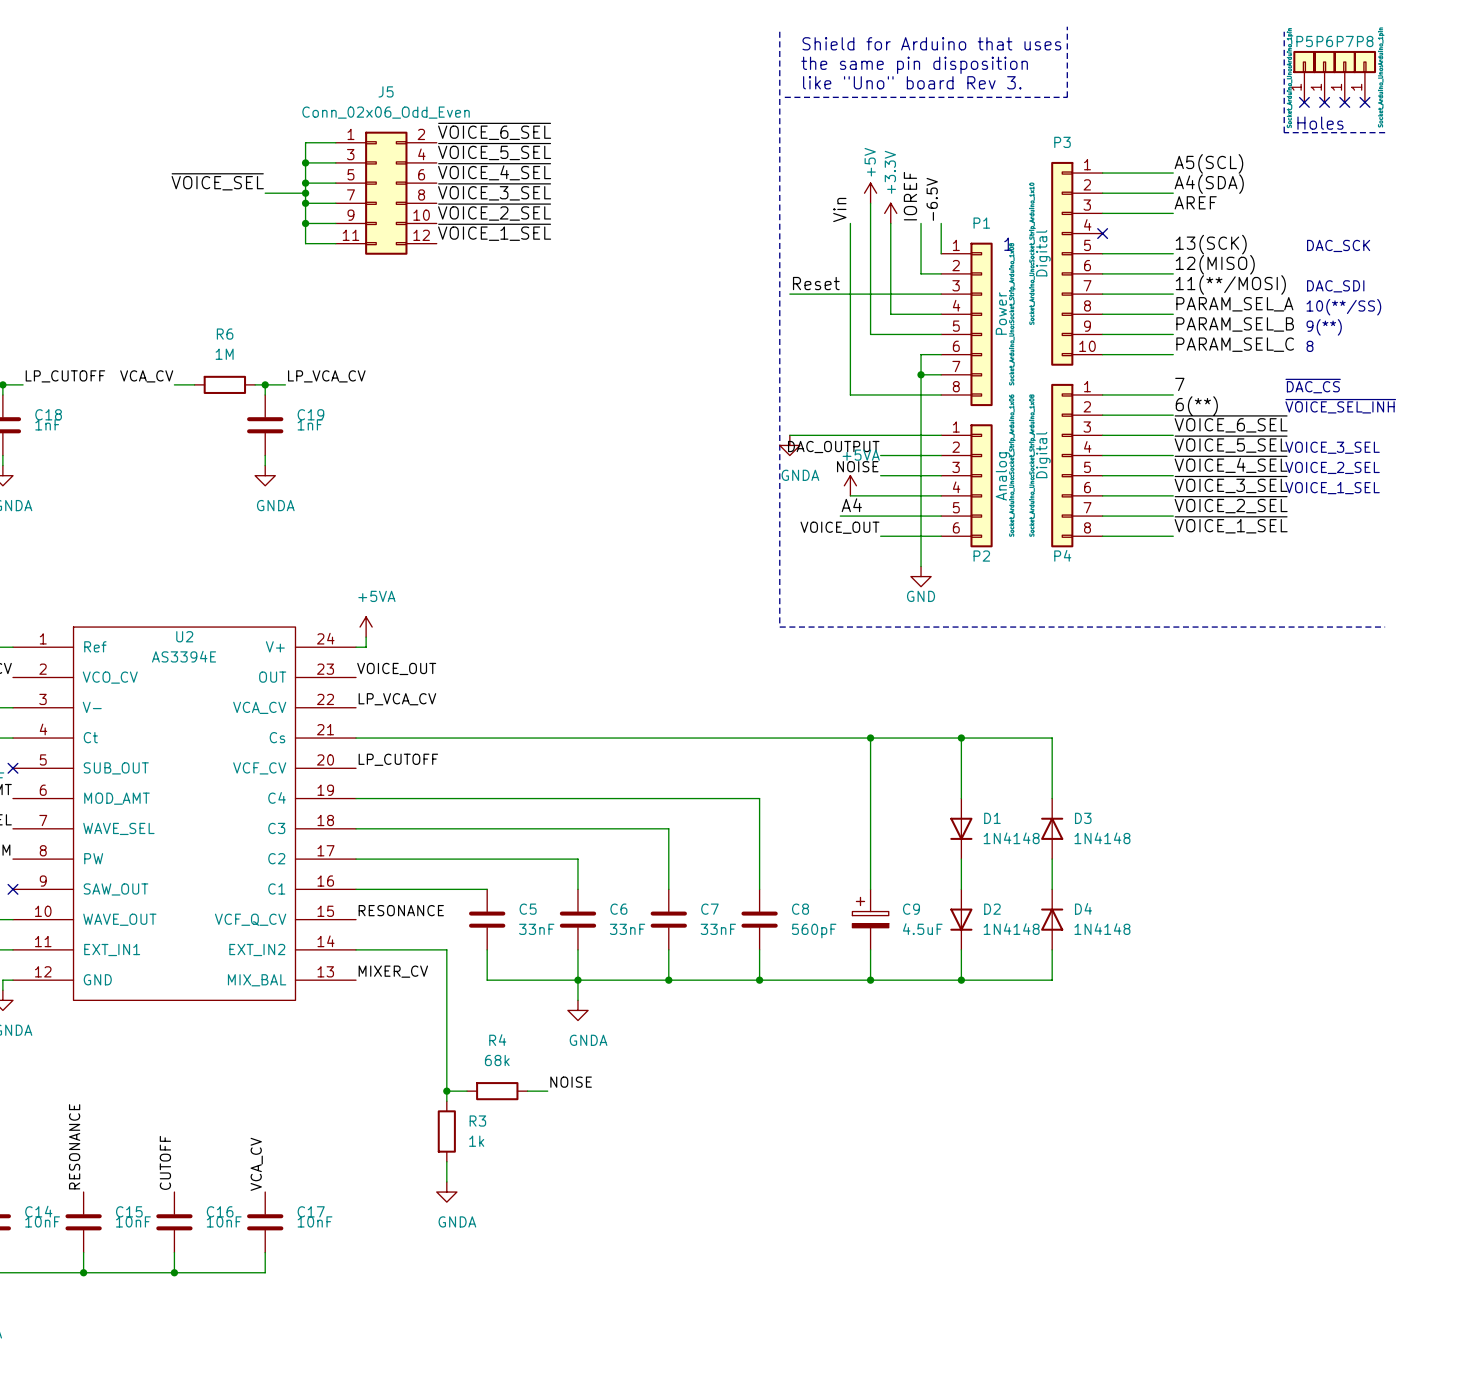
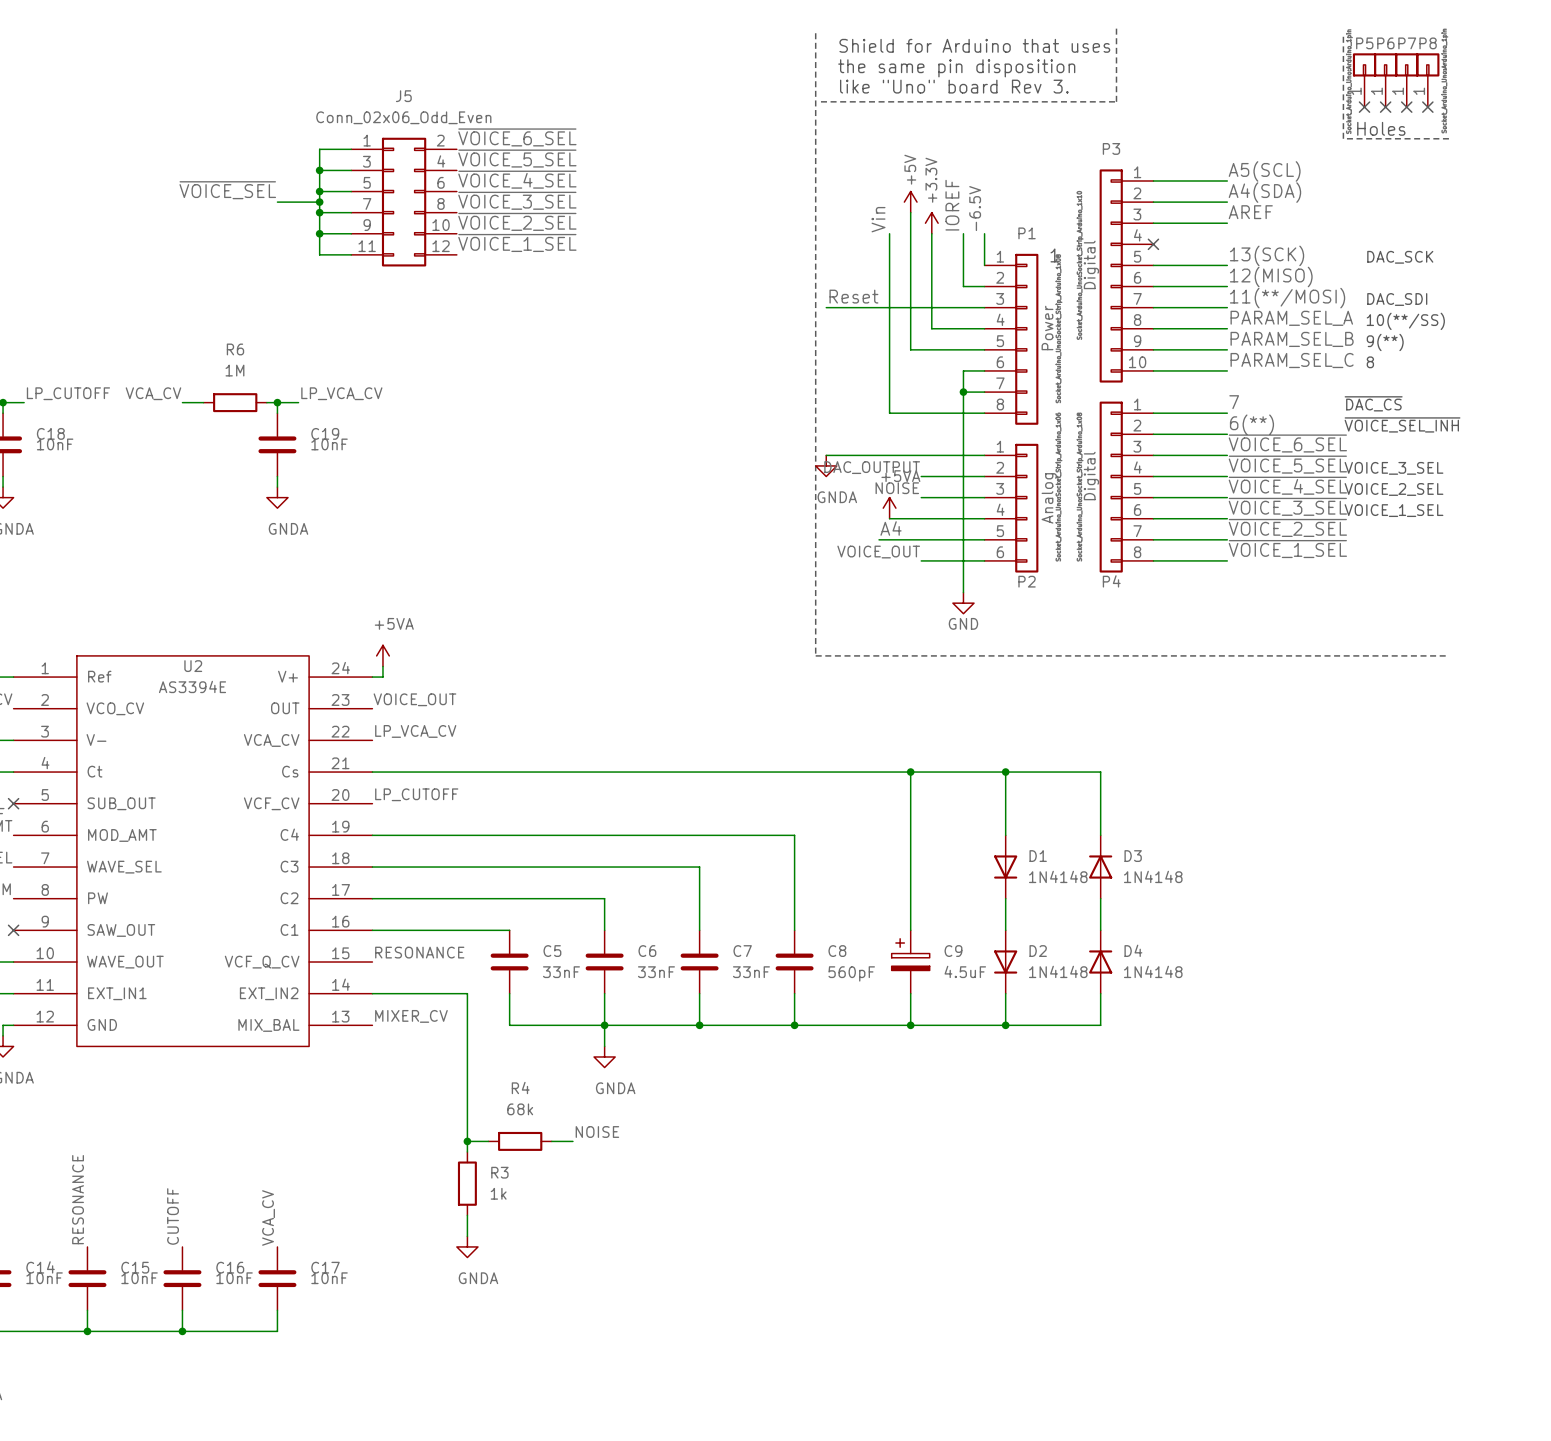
C18 value: 1nF (47, 424) -> 10nF (55, 444)
C19 value: 1nF (310, 424) -> 10nF (329, 444)

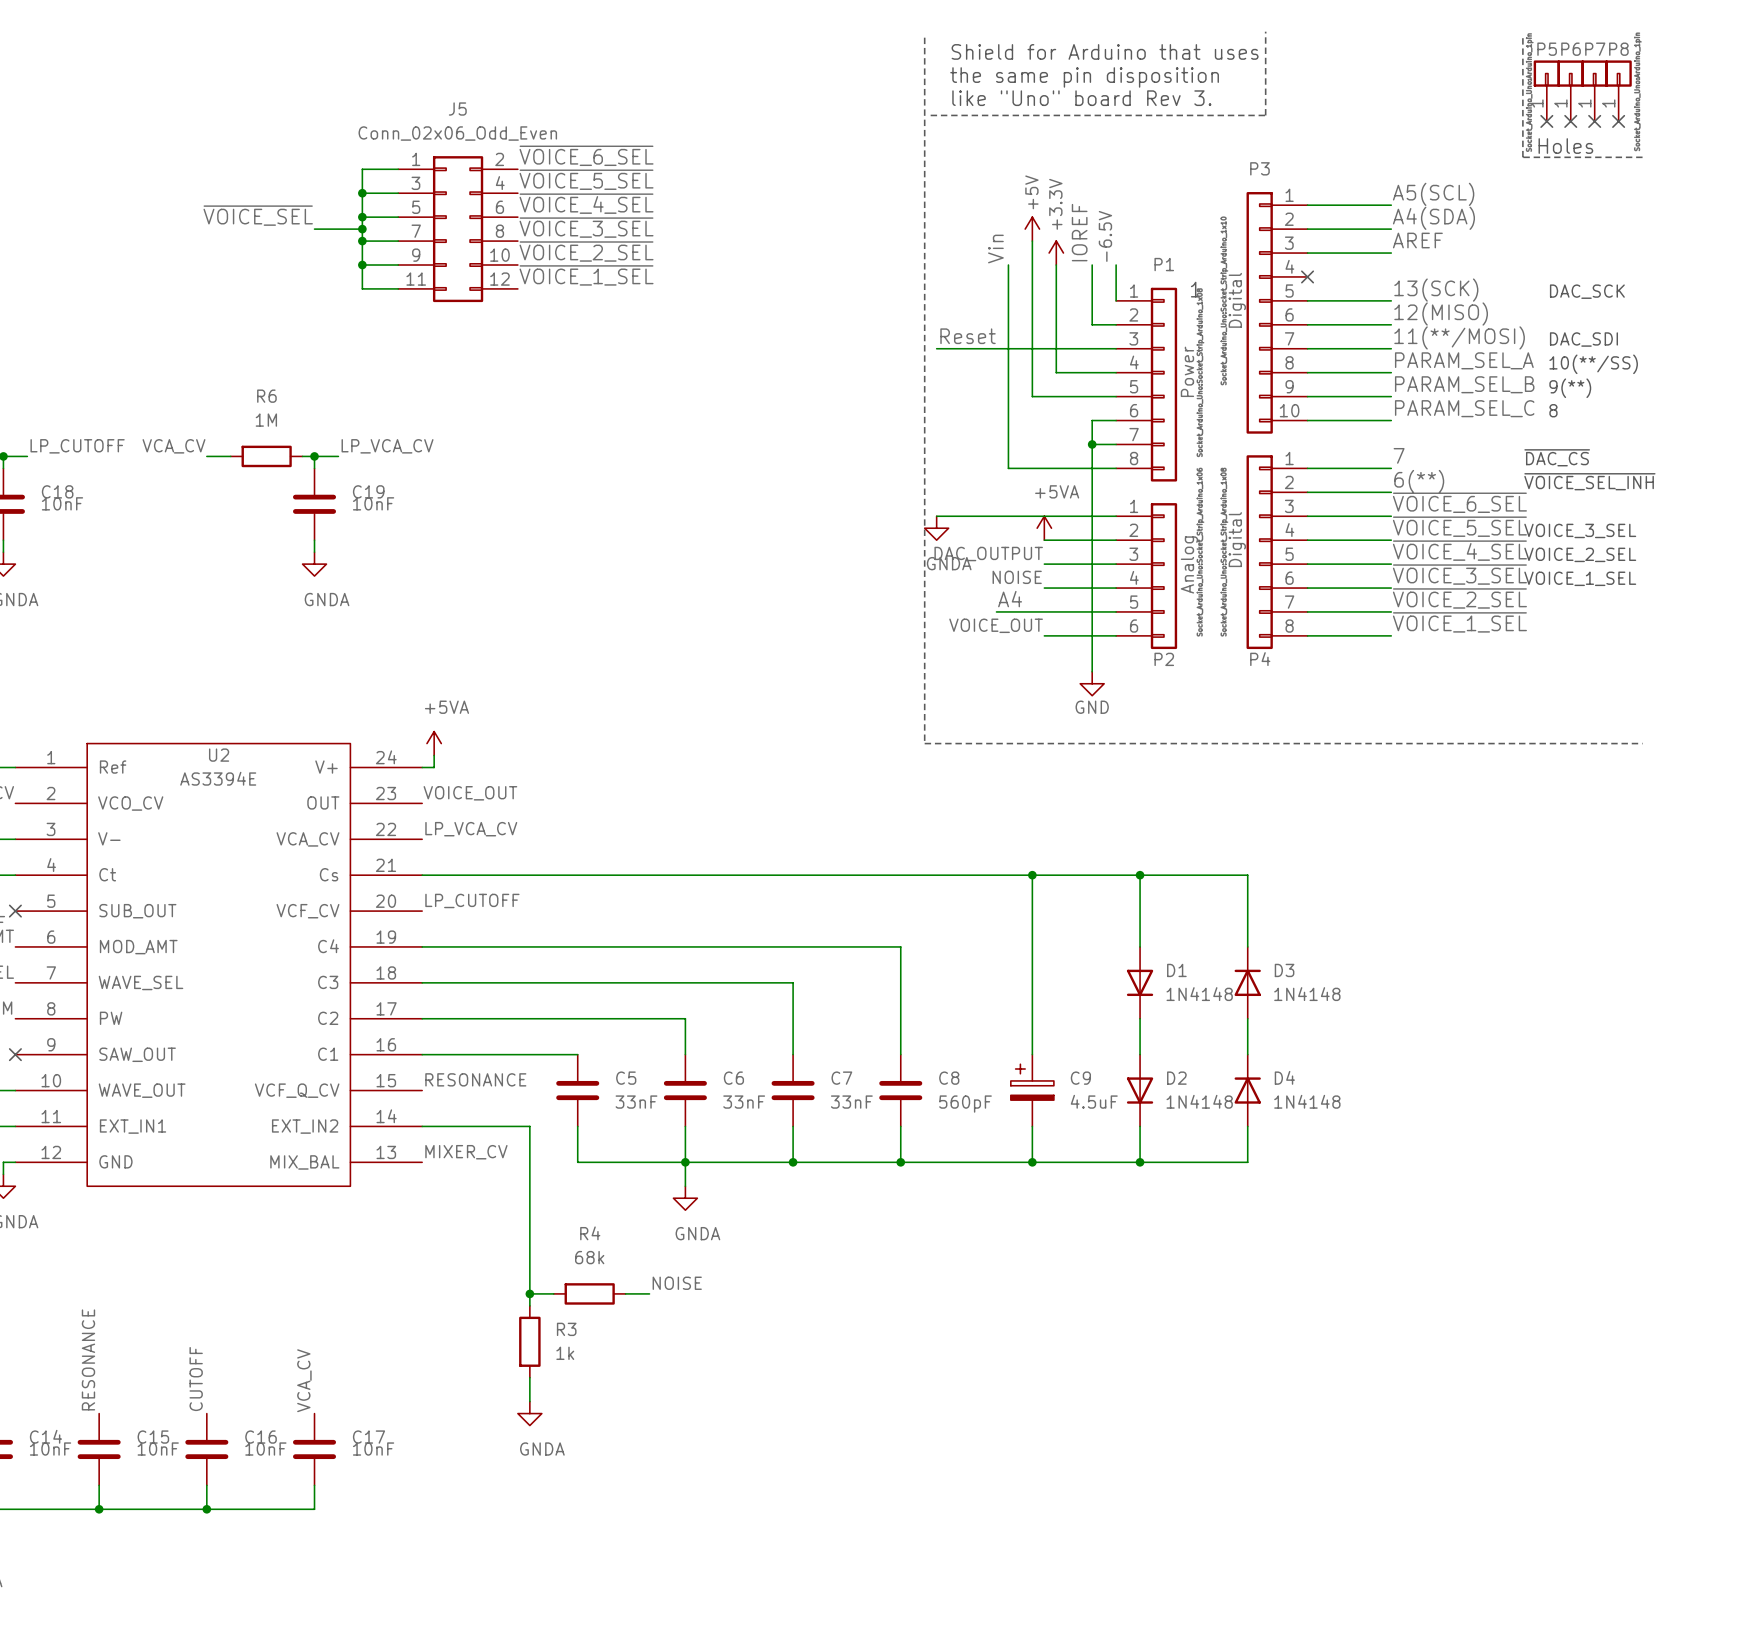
label: DAC_OUTPUT (872, 467) -> none
label: NOISE (897, 488) -> DAC_OUTPUT (988, 554)
power symbol position: +5VA (889, 508) -> +5VA (1044, 528)
label: none -> NOISE (1017, 577)
wire: (889, 518) (921, 518) -> none

